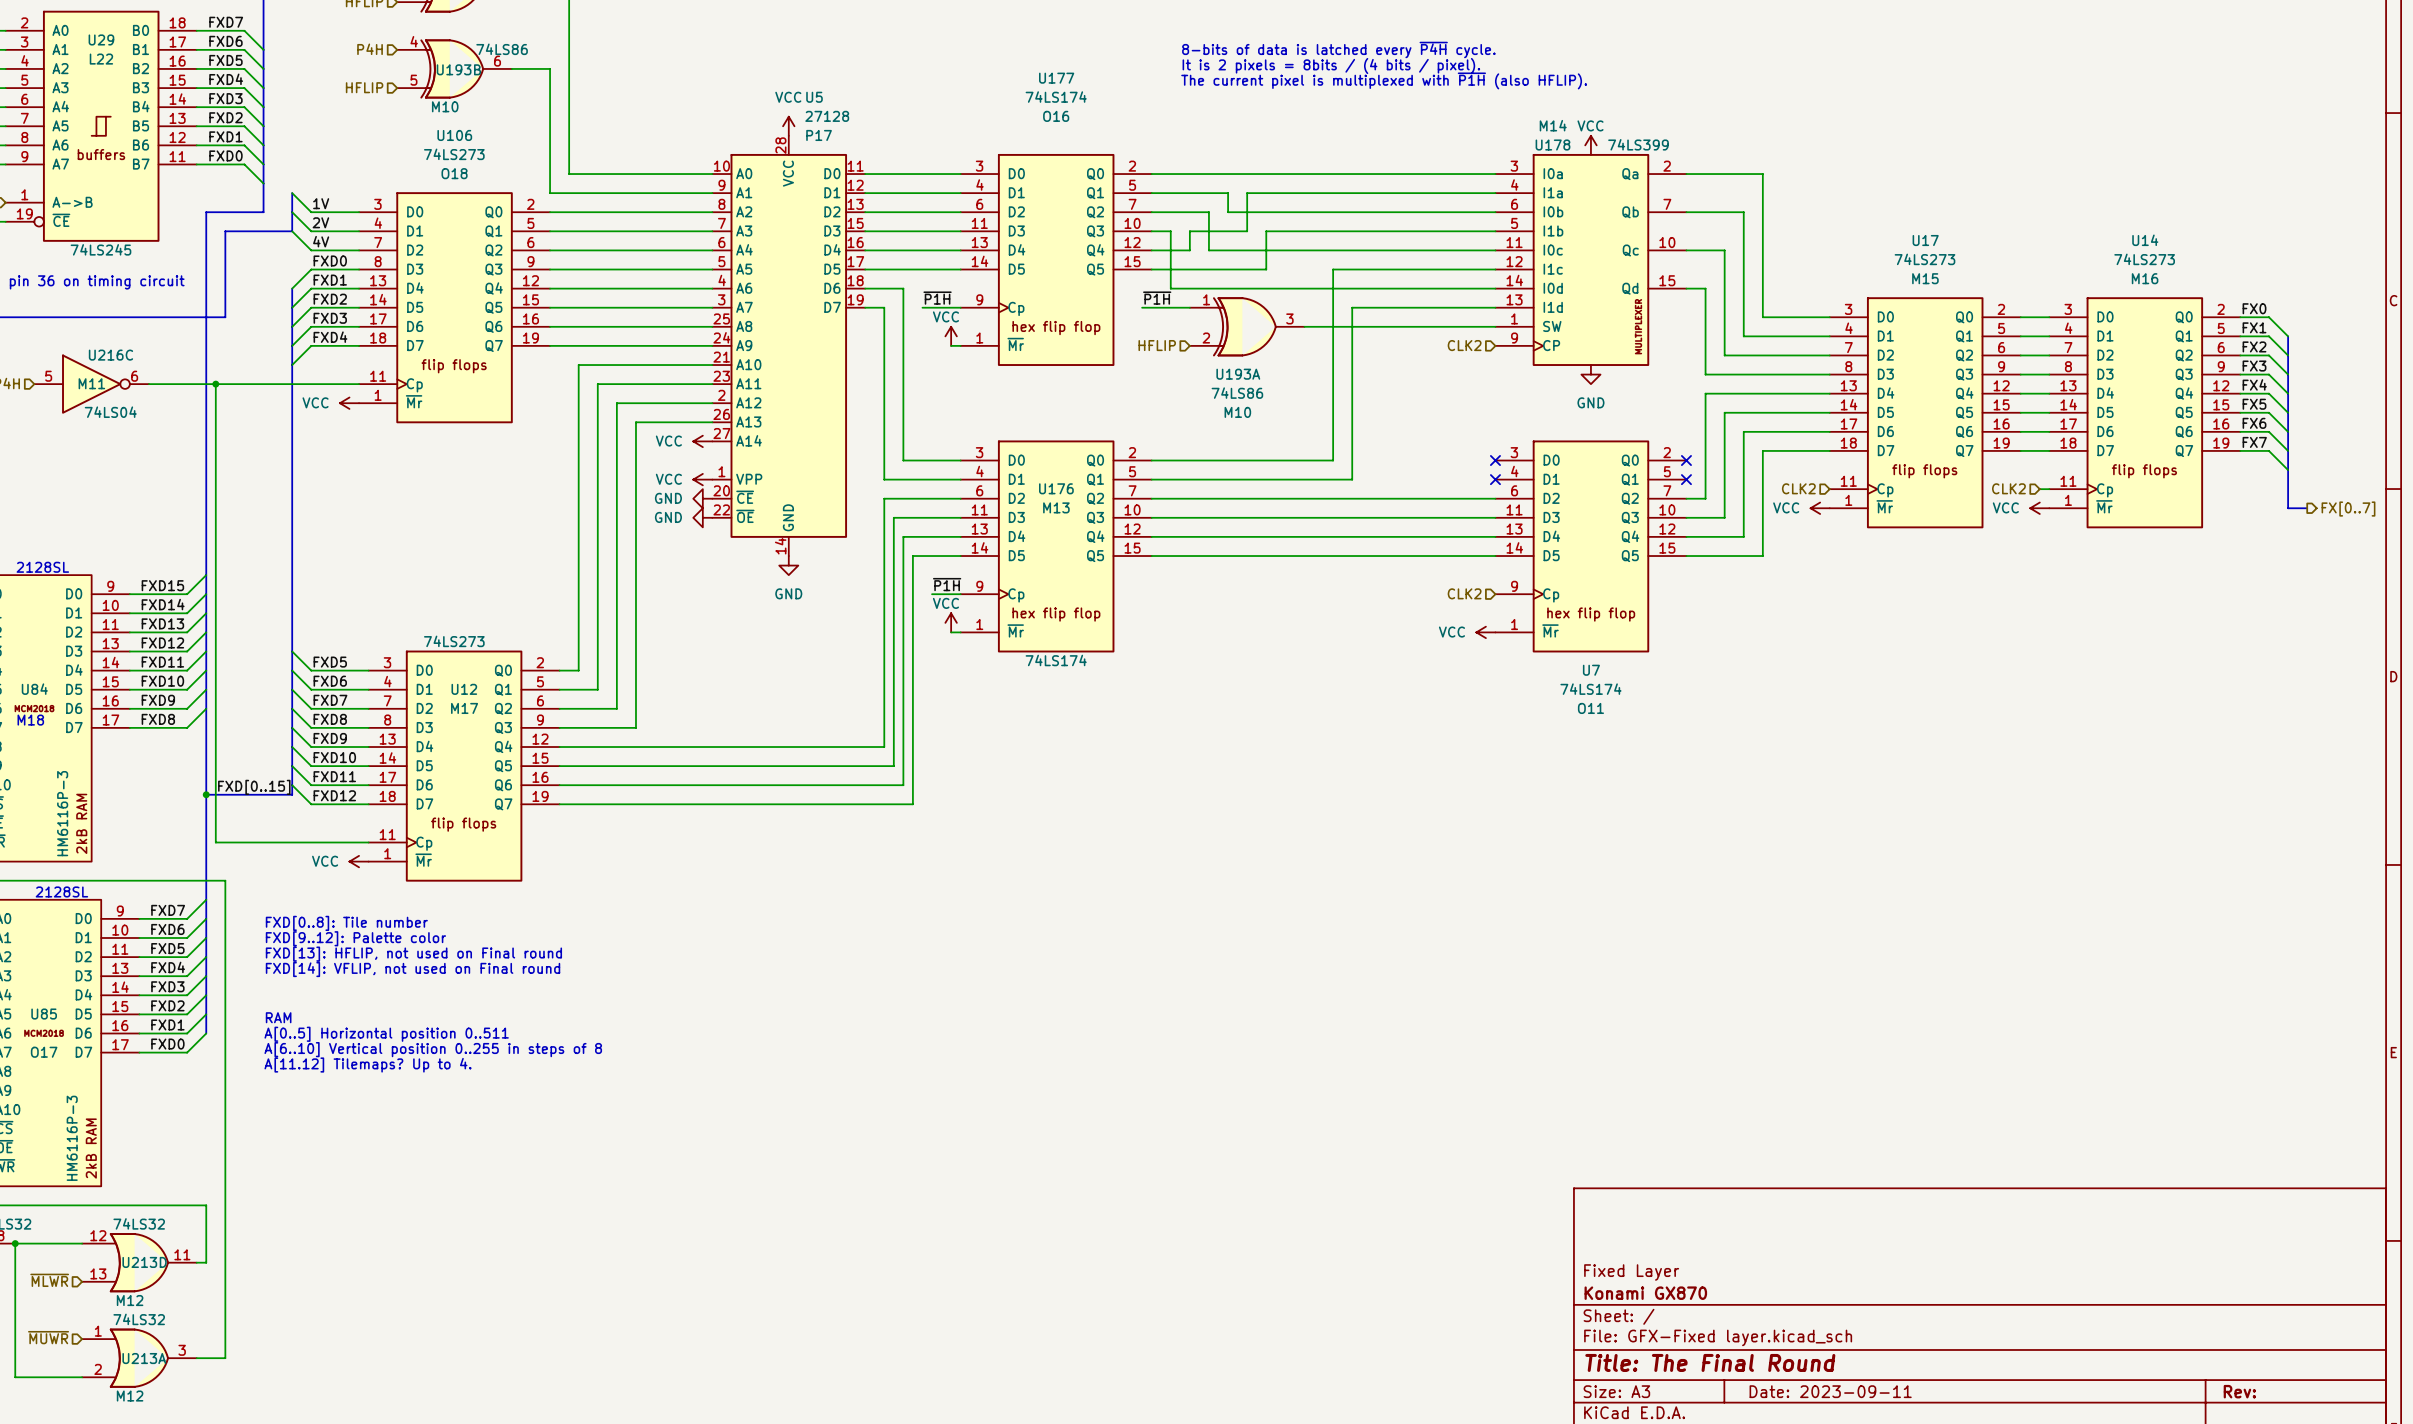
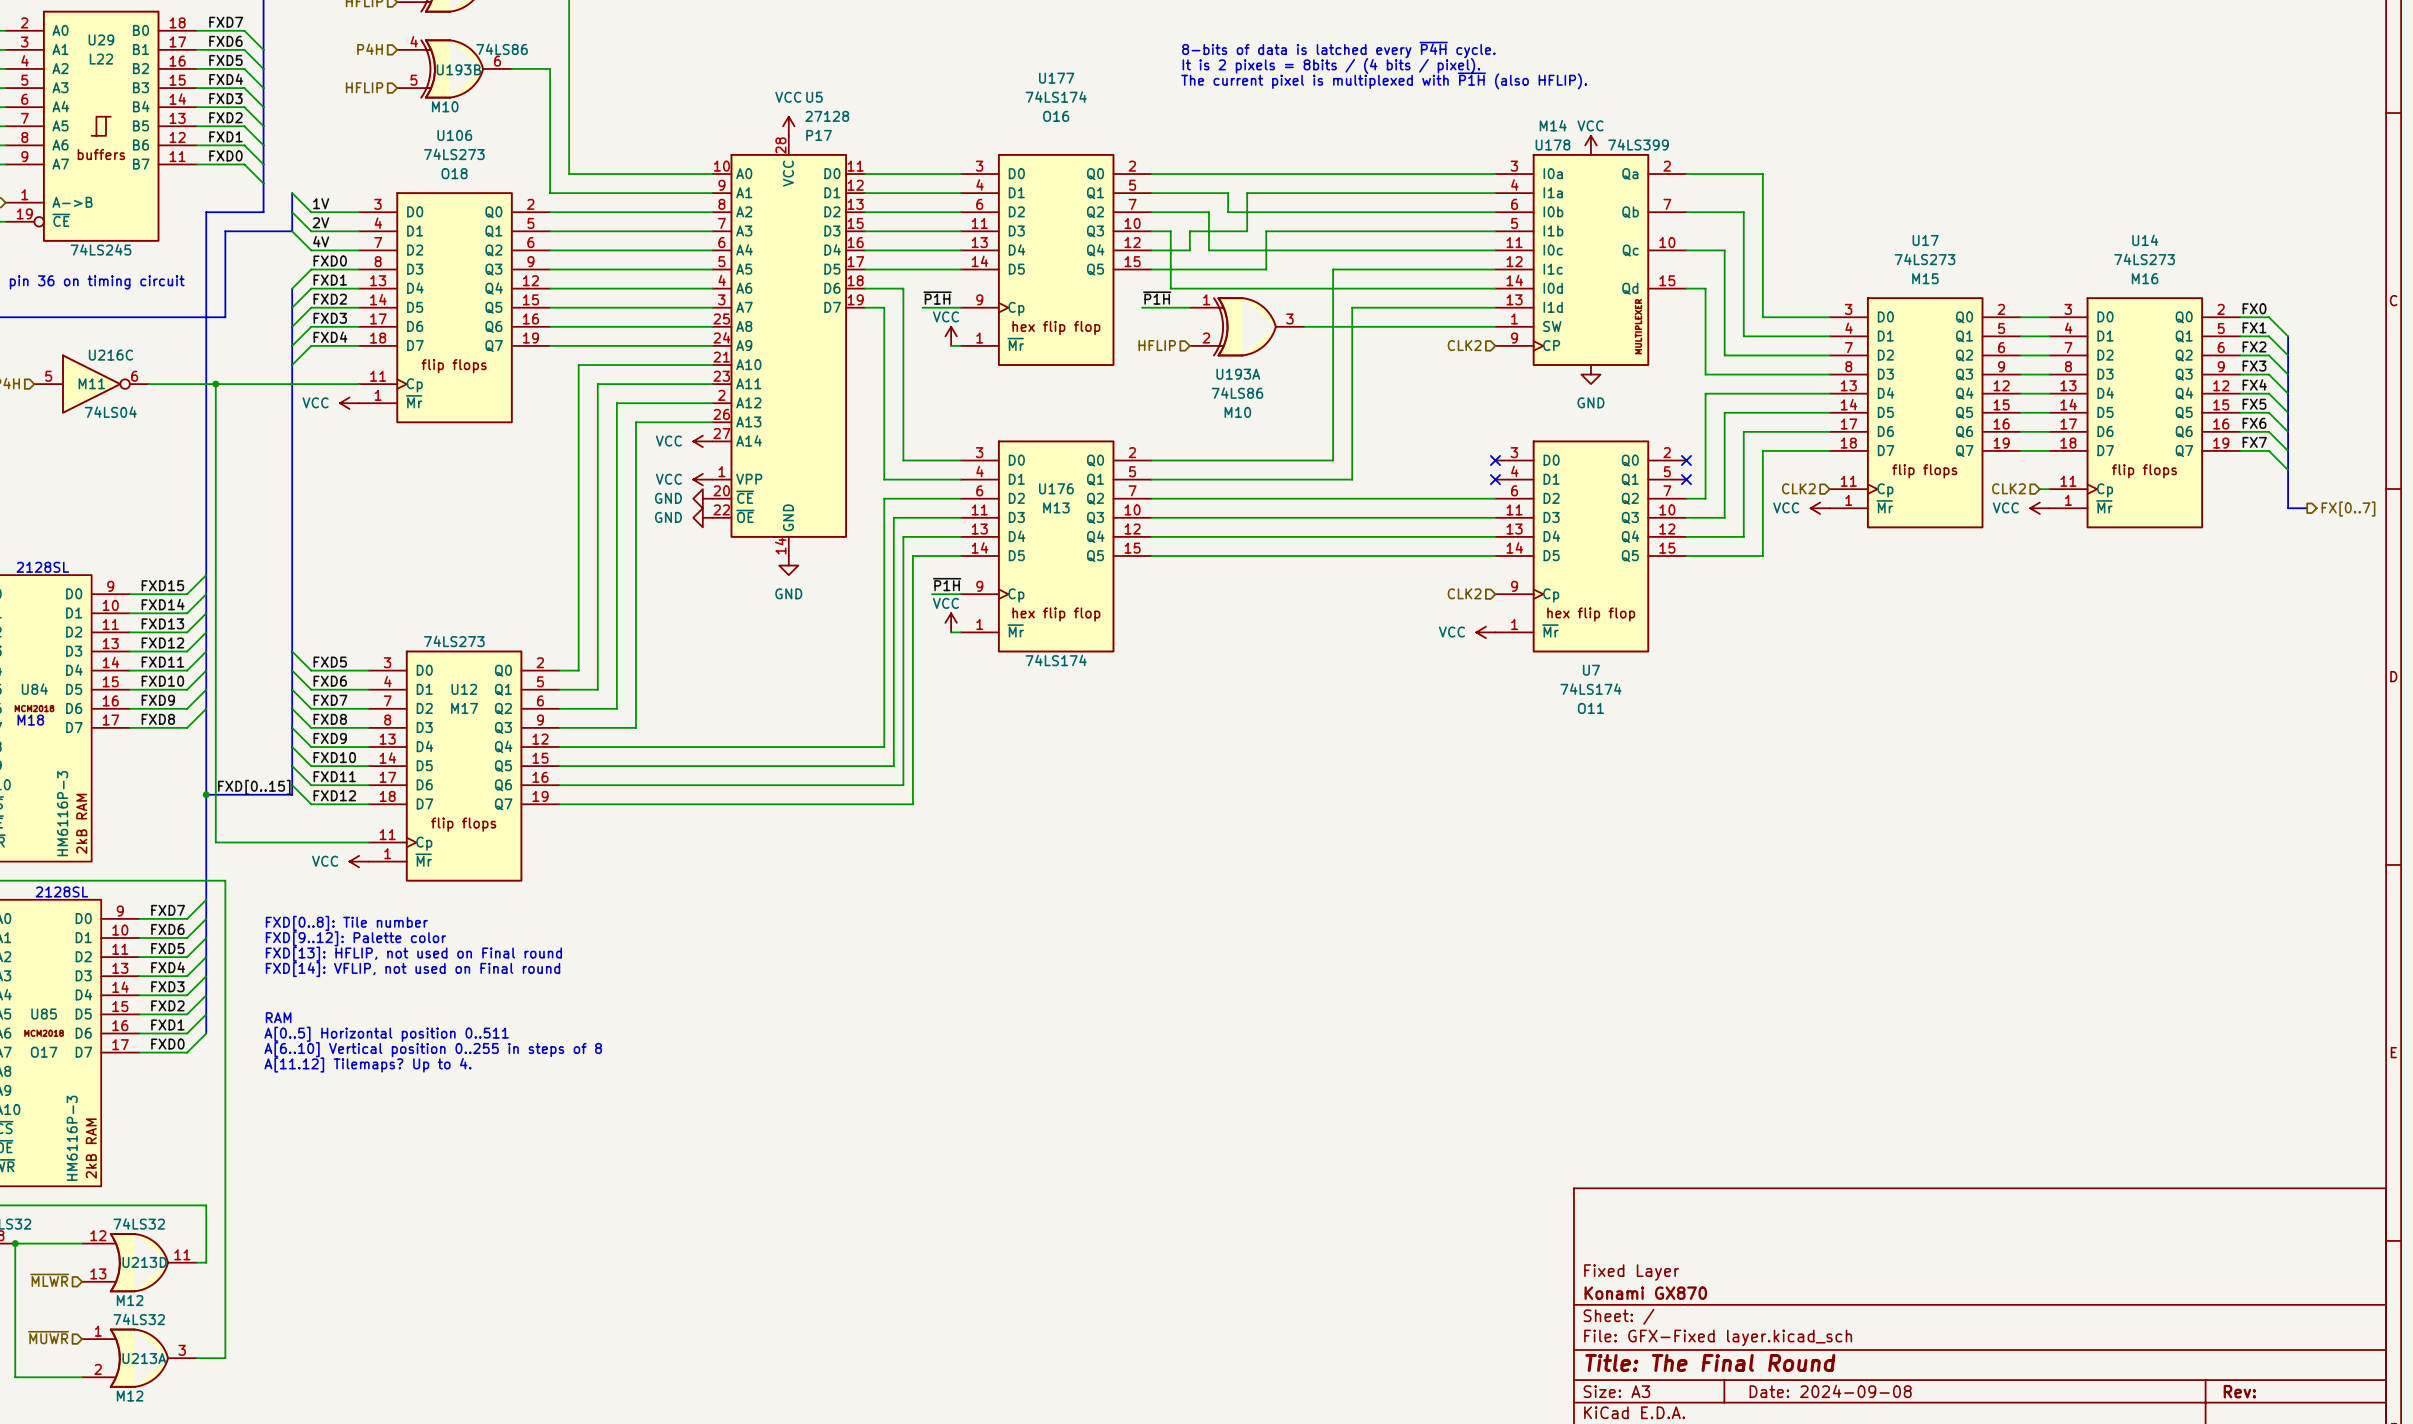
title block: Date: 2023-09-11 (1830, 1391) -> Date: 2024-09-08 (1830, 1391)

